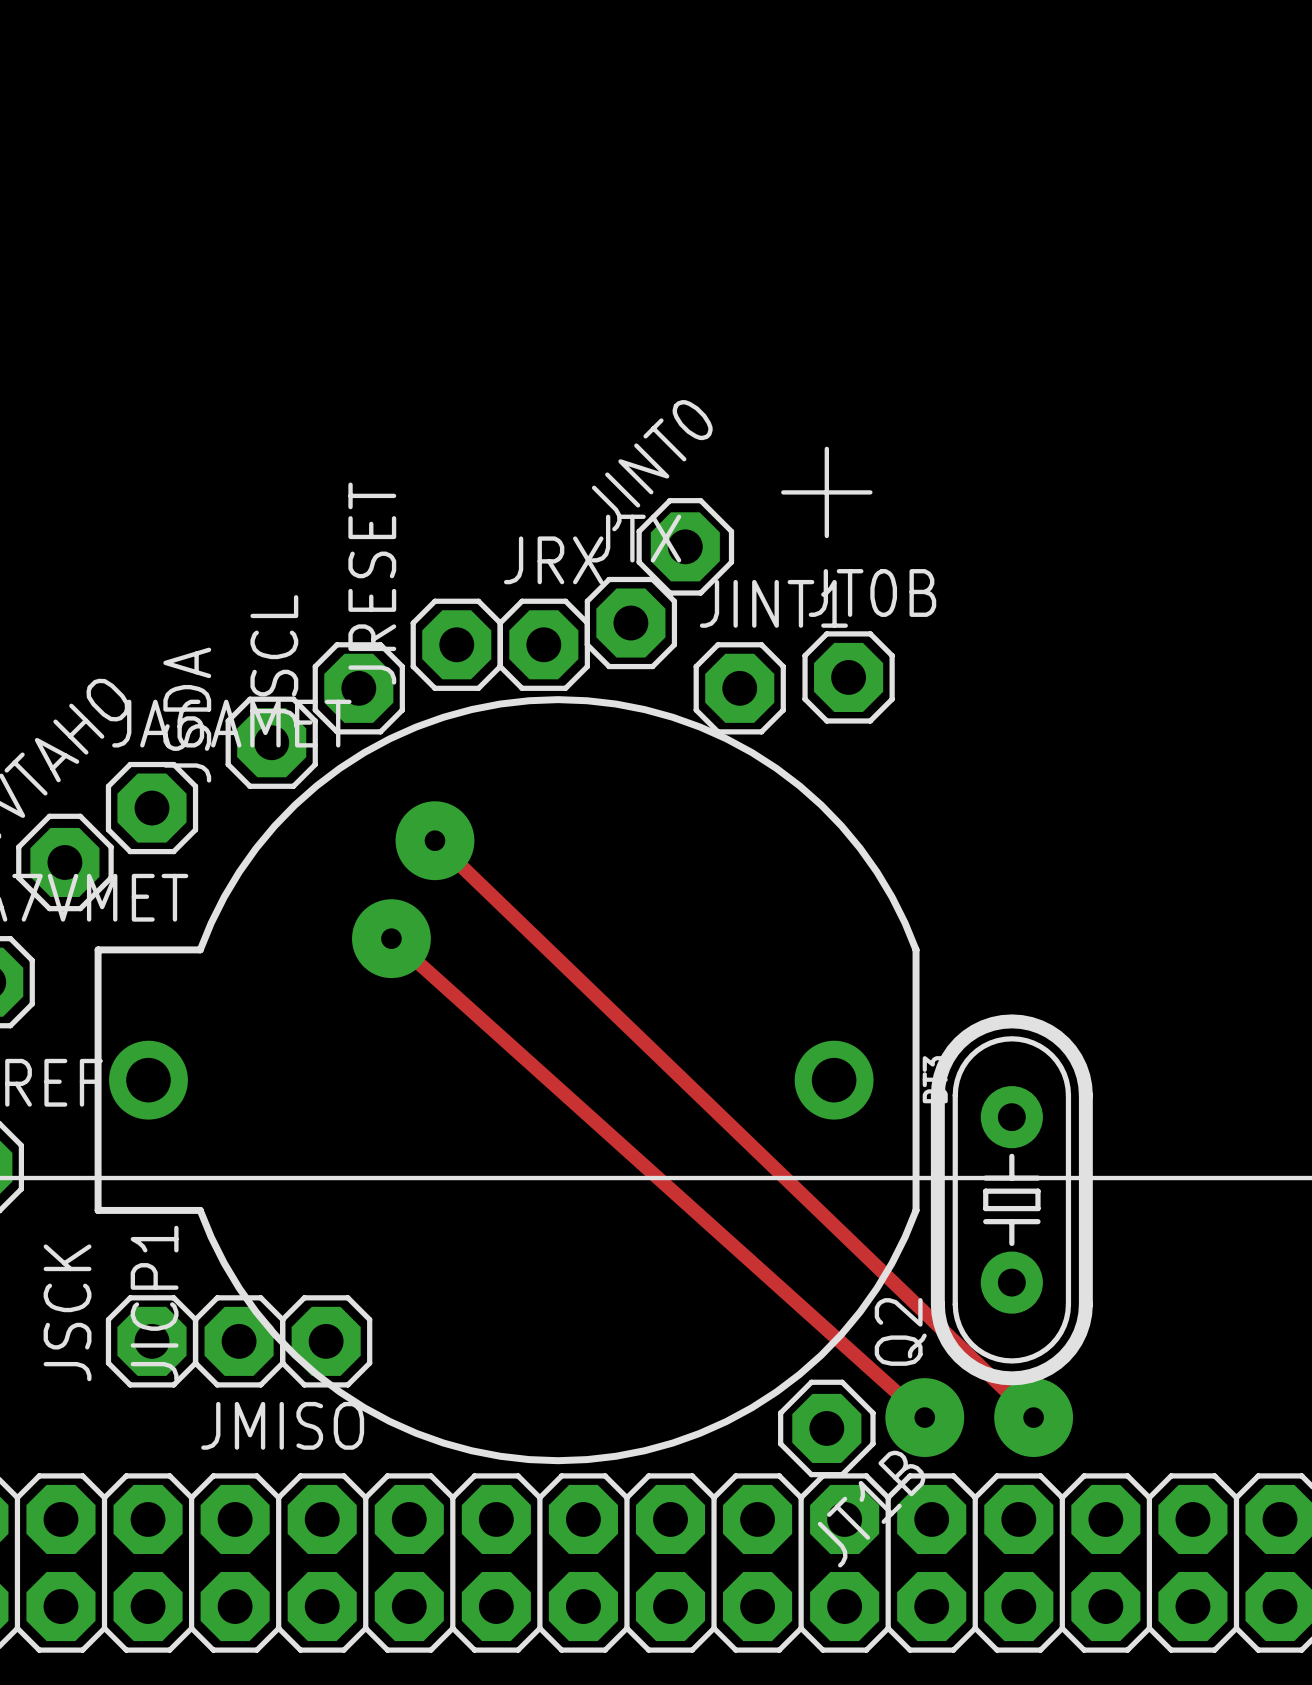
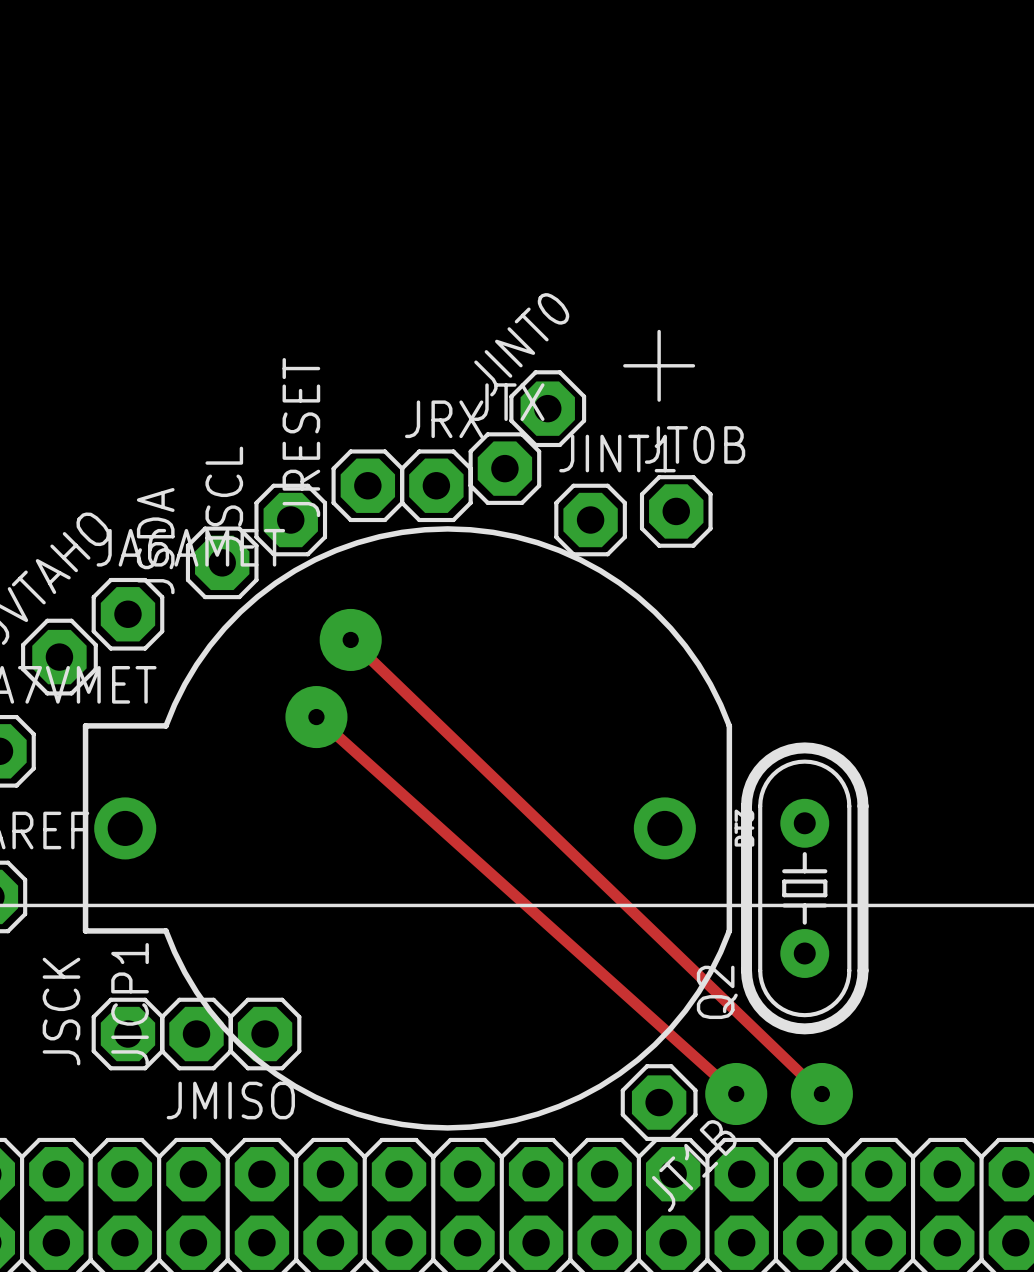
Q2 position: (1011, 1199) -> (804, 888)

